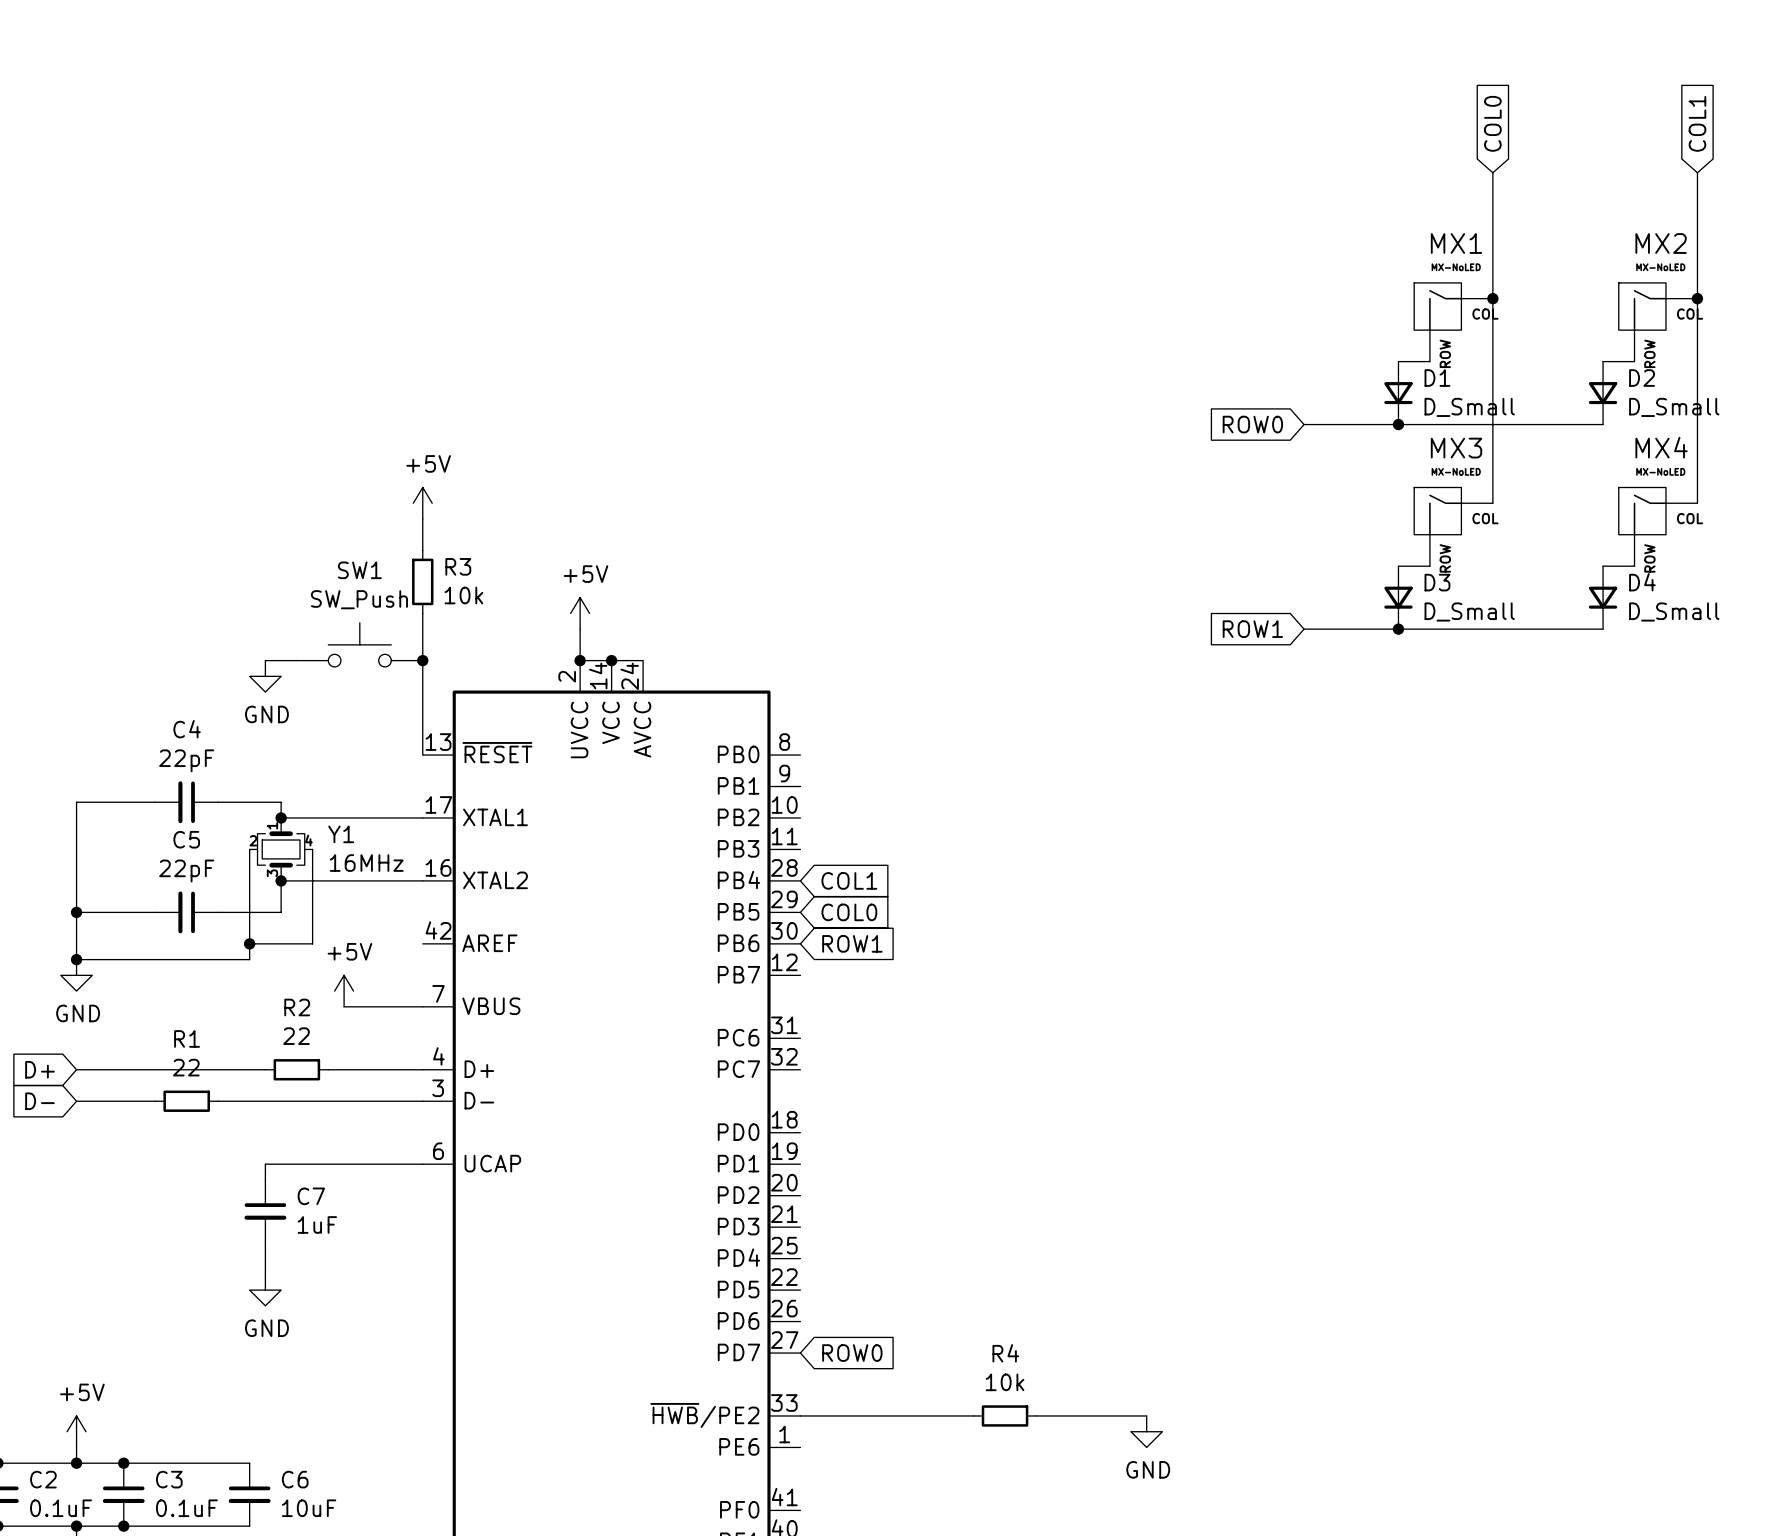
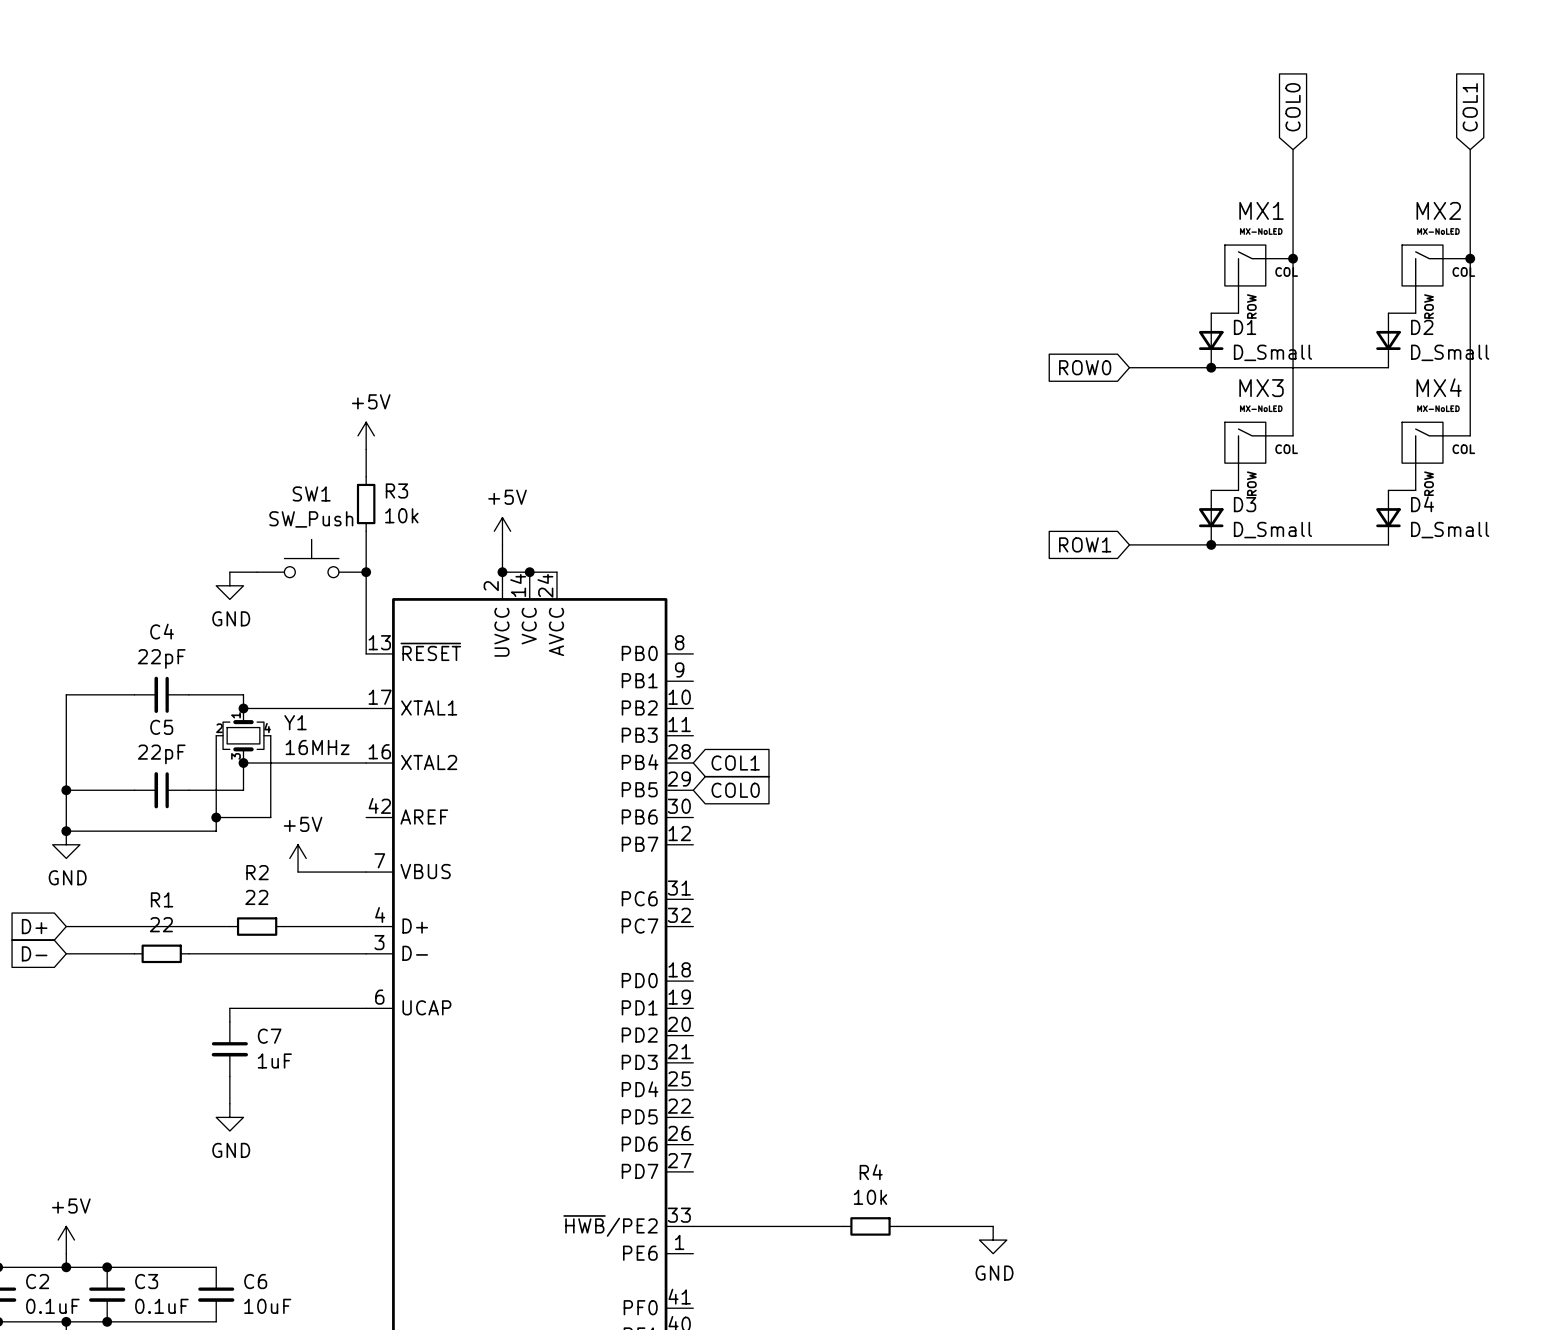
global label: ROW1 (852, 943) -> none
global label: ROW0 (852, 1353) -> none

